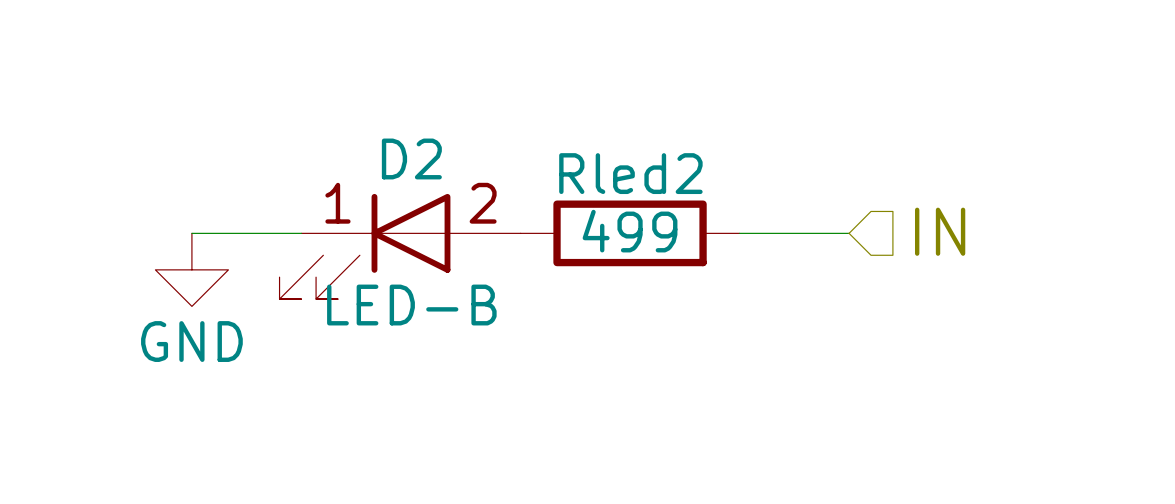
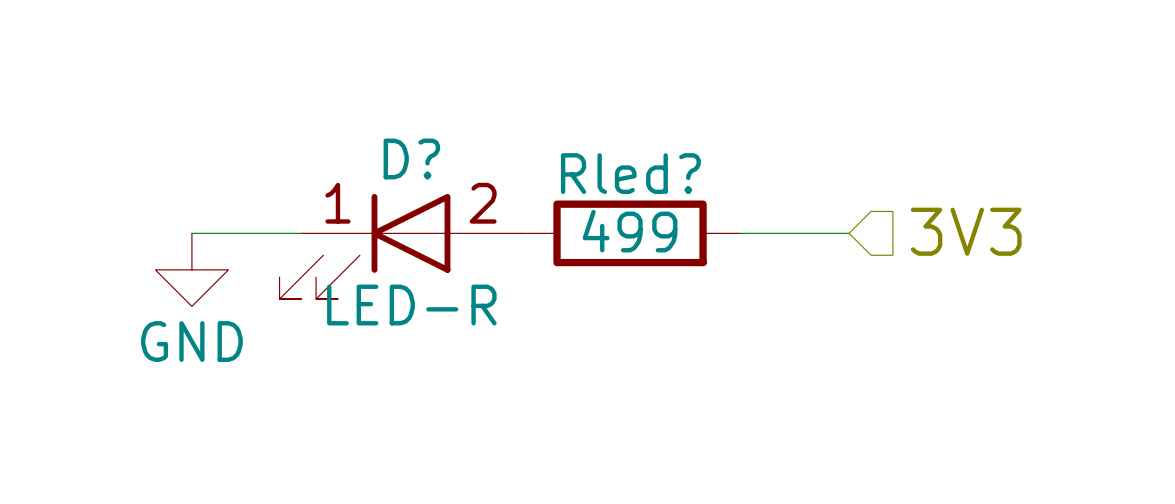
D2 name: D2 (411, 158) -> D? (411, 158)
Rled2 name: Rled2 (630, 173) -> Rled? (630, 173)
hierarchical label: IN (940, 231) -> 3V3 (966, 231)
D2 value: LED-B (411, 305) -> LED-R (411, 305)

